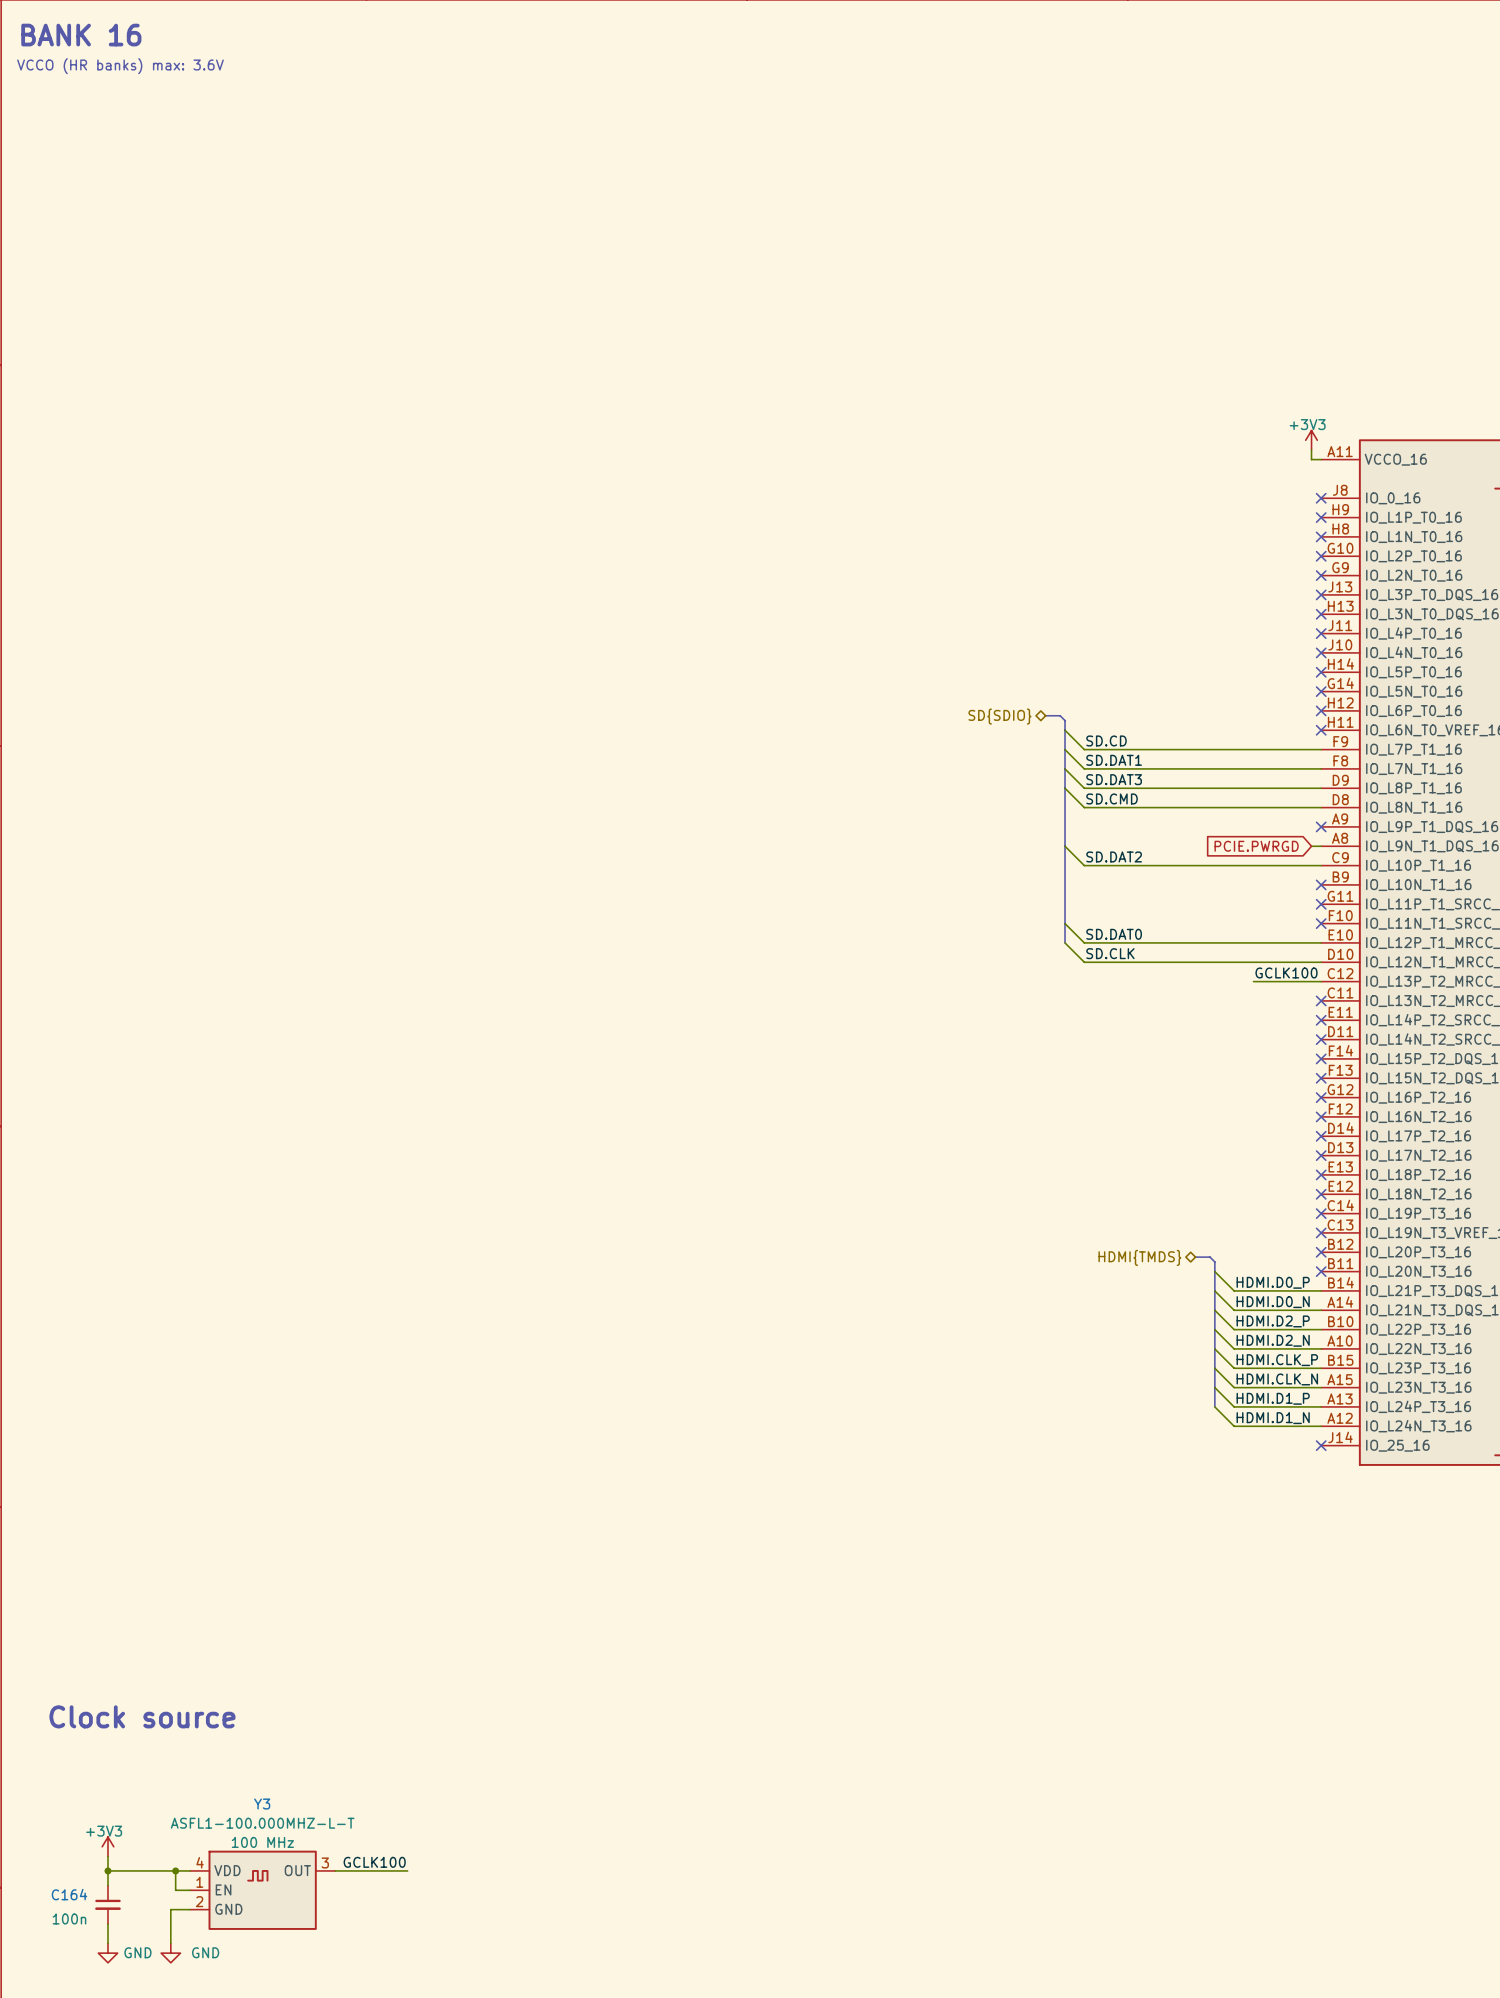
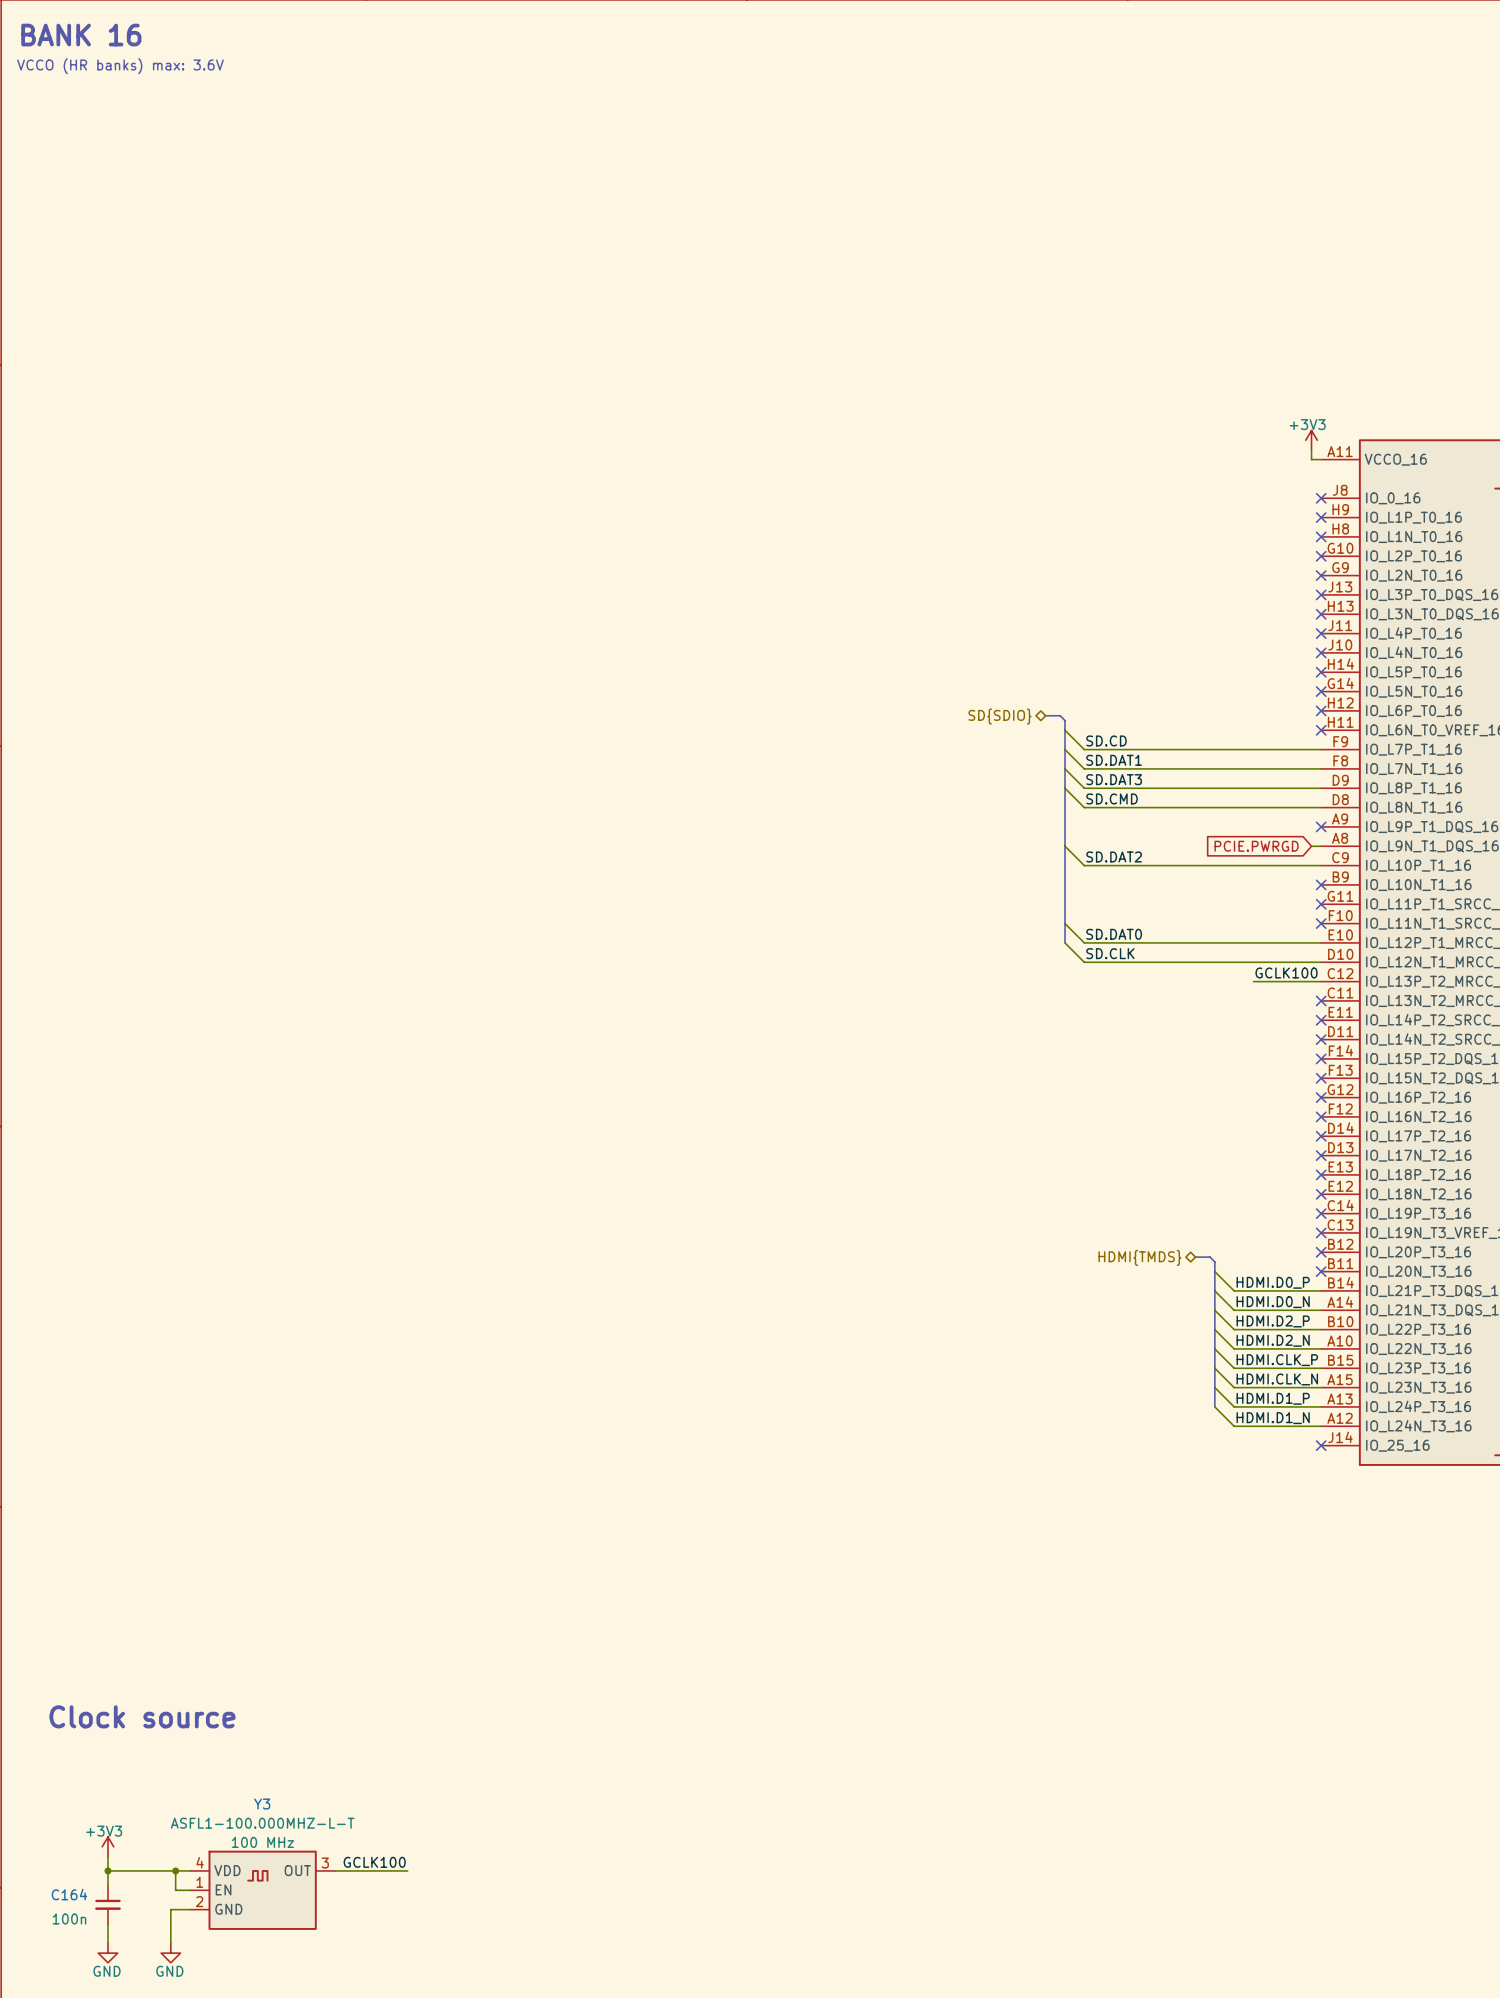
power symbol text position: GND (137, 1952) -> GND (107, 1971)
power symbol text position: GND (205, 1952) -> GND (169, 1971)

